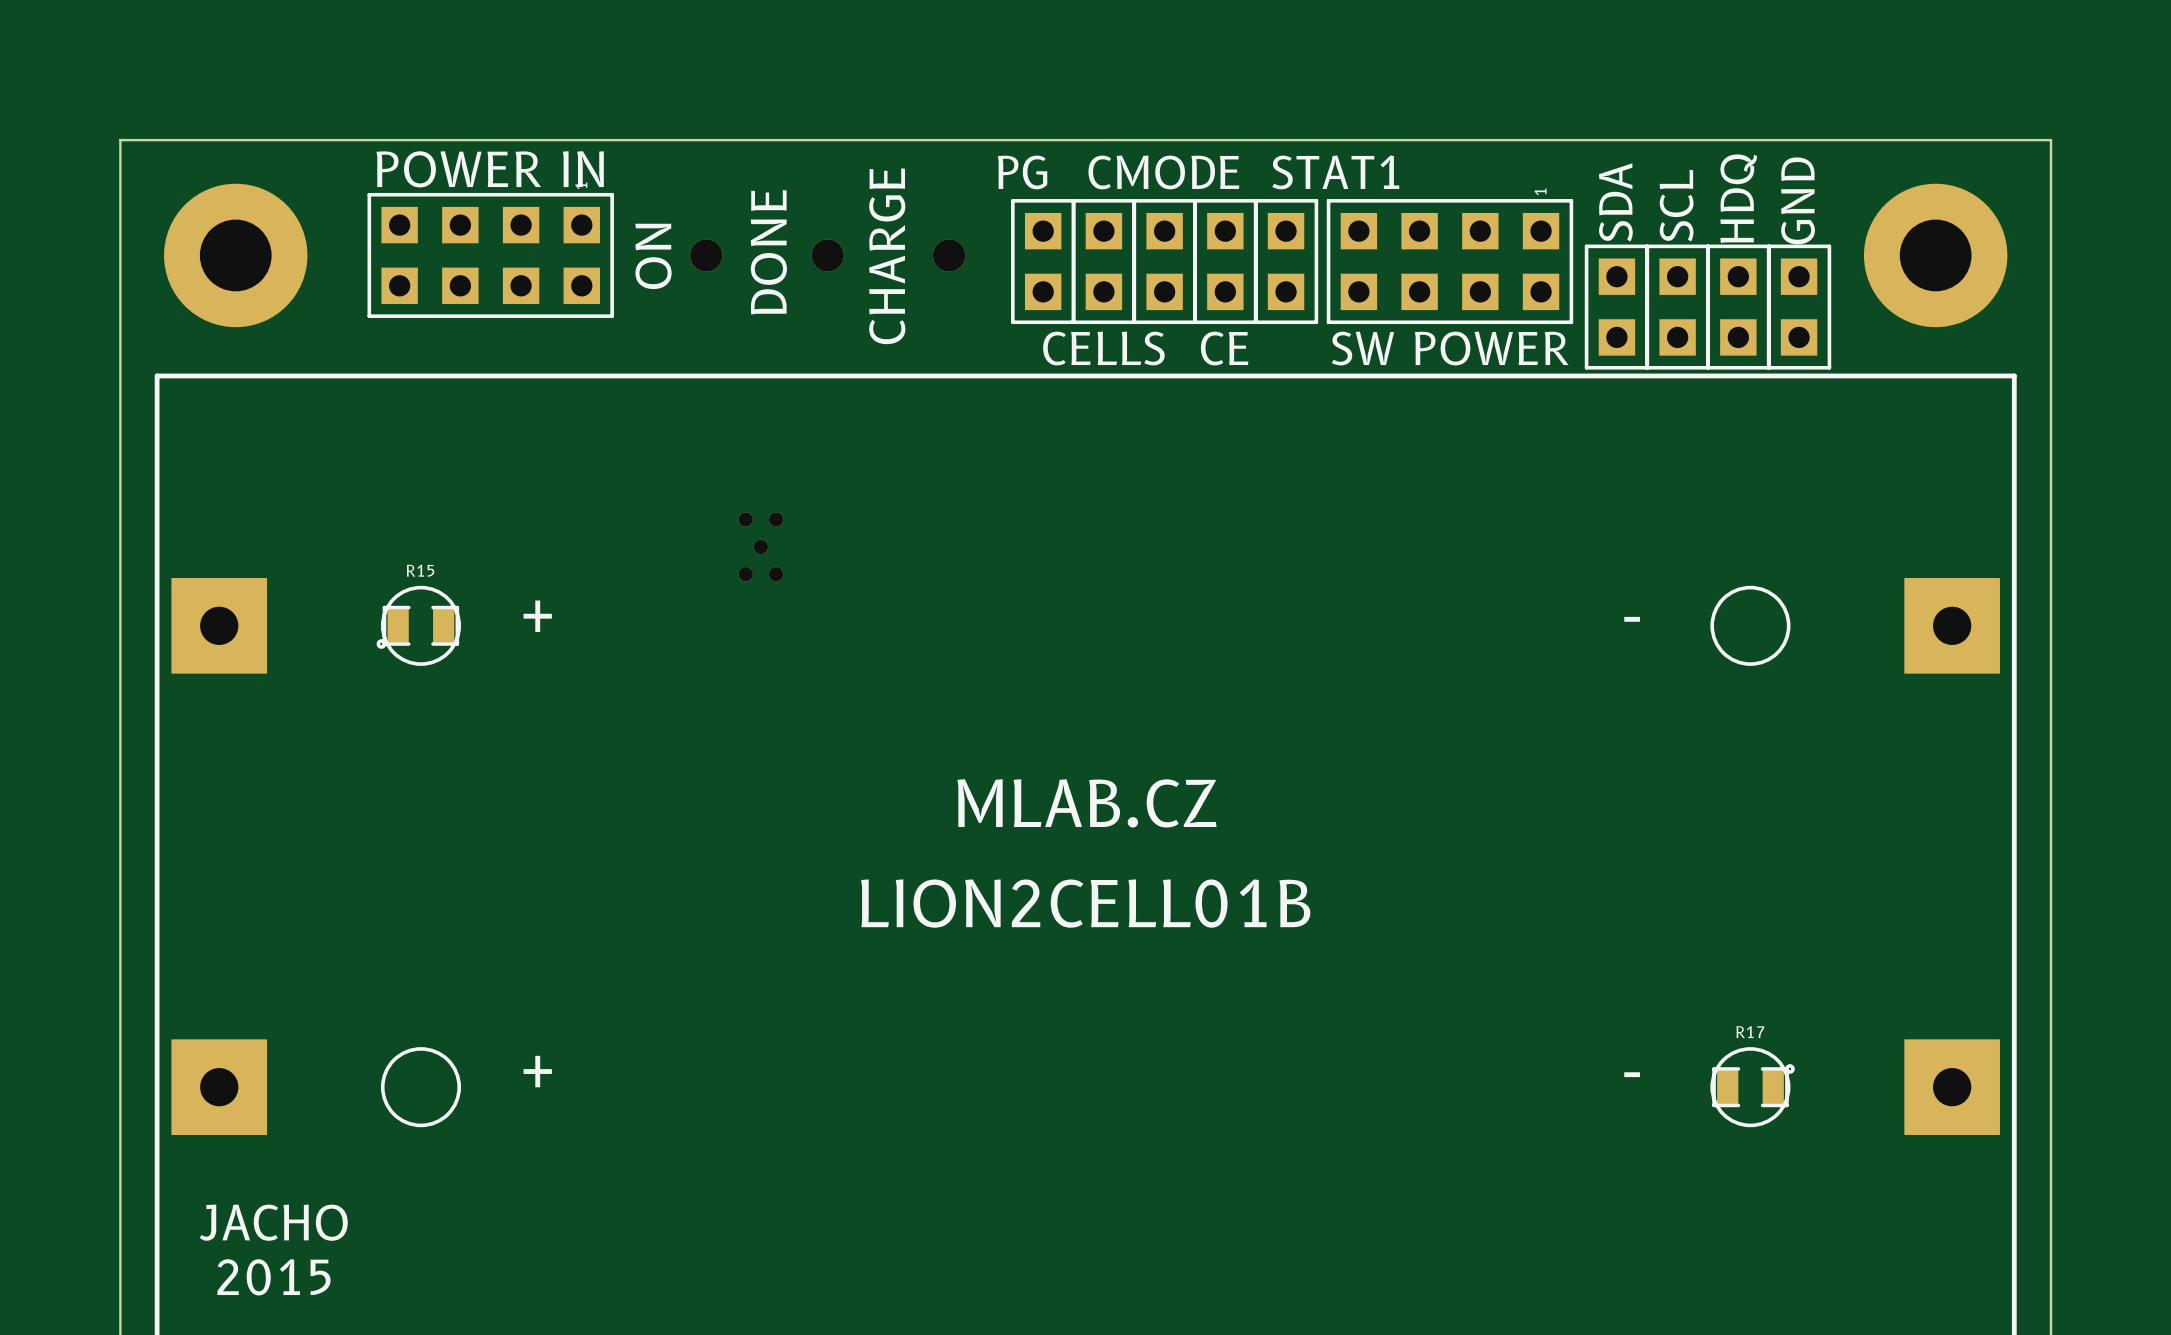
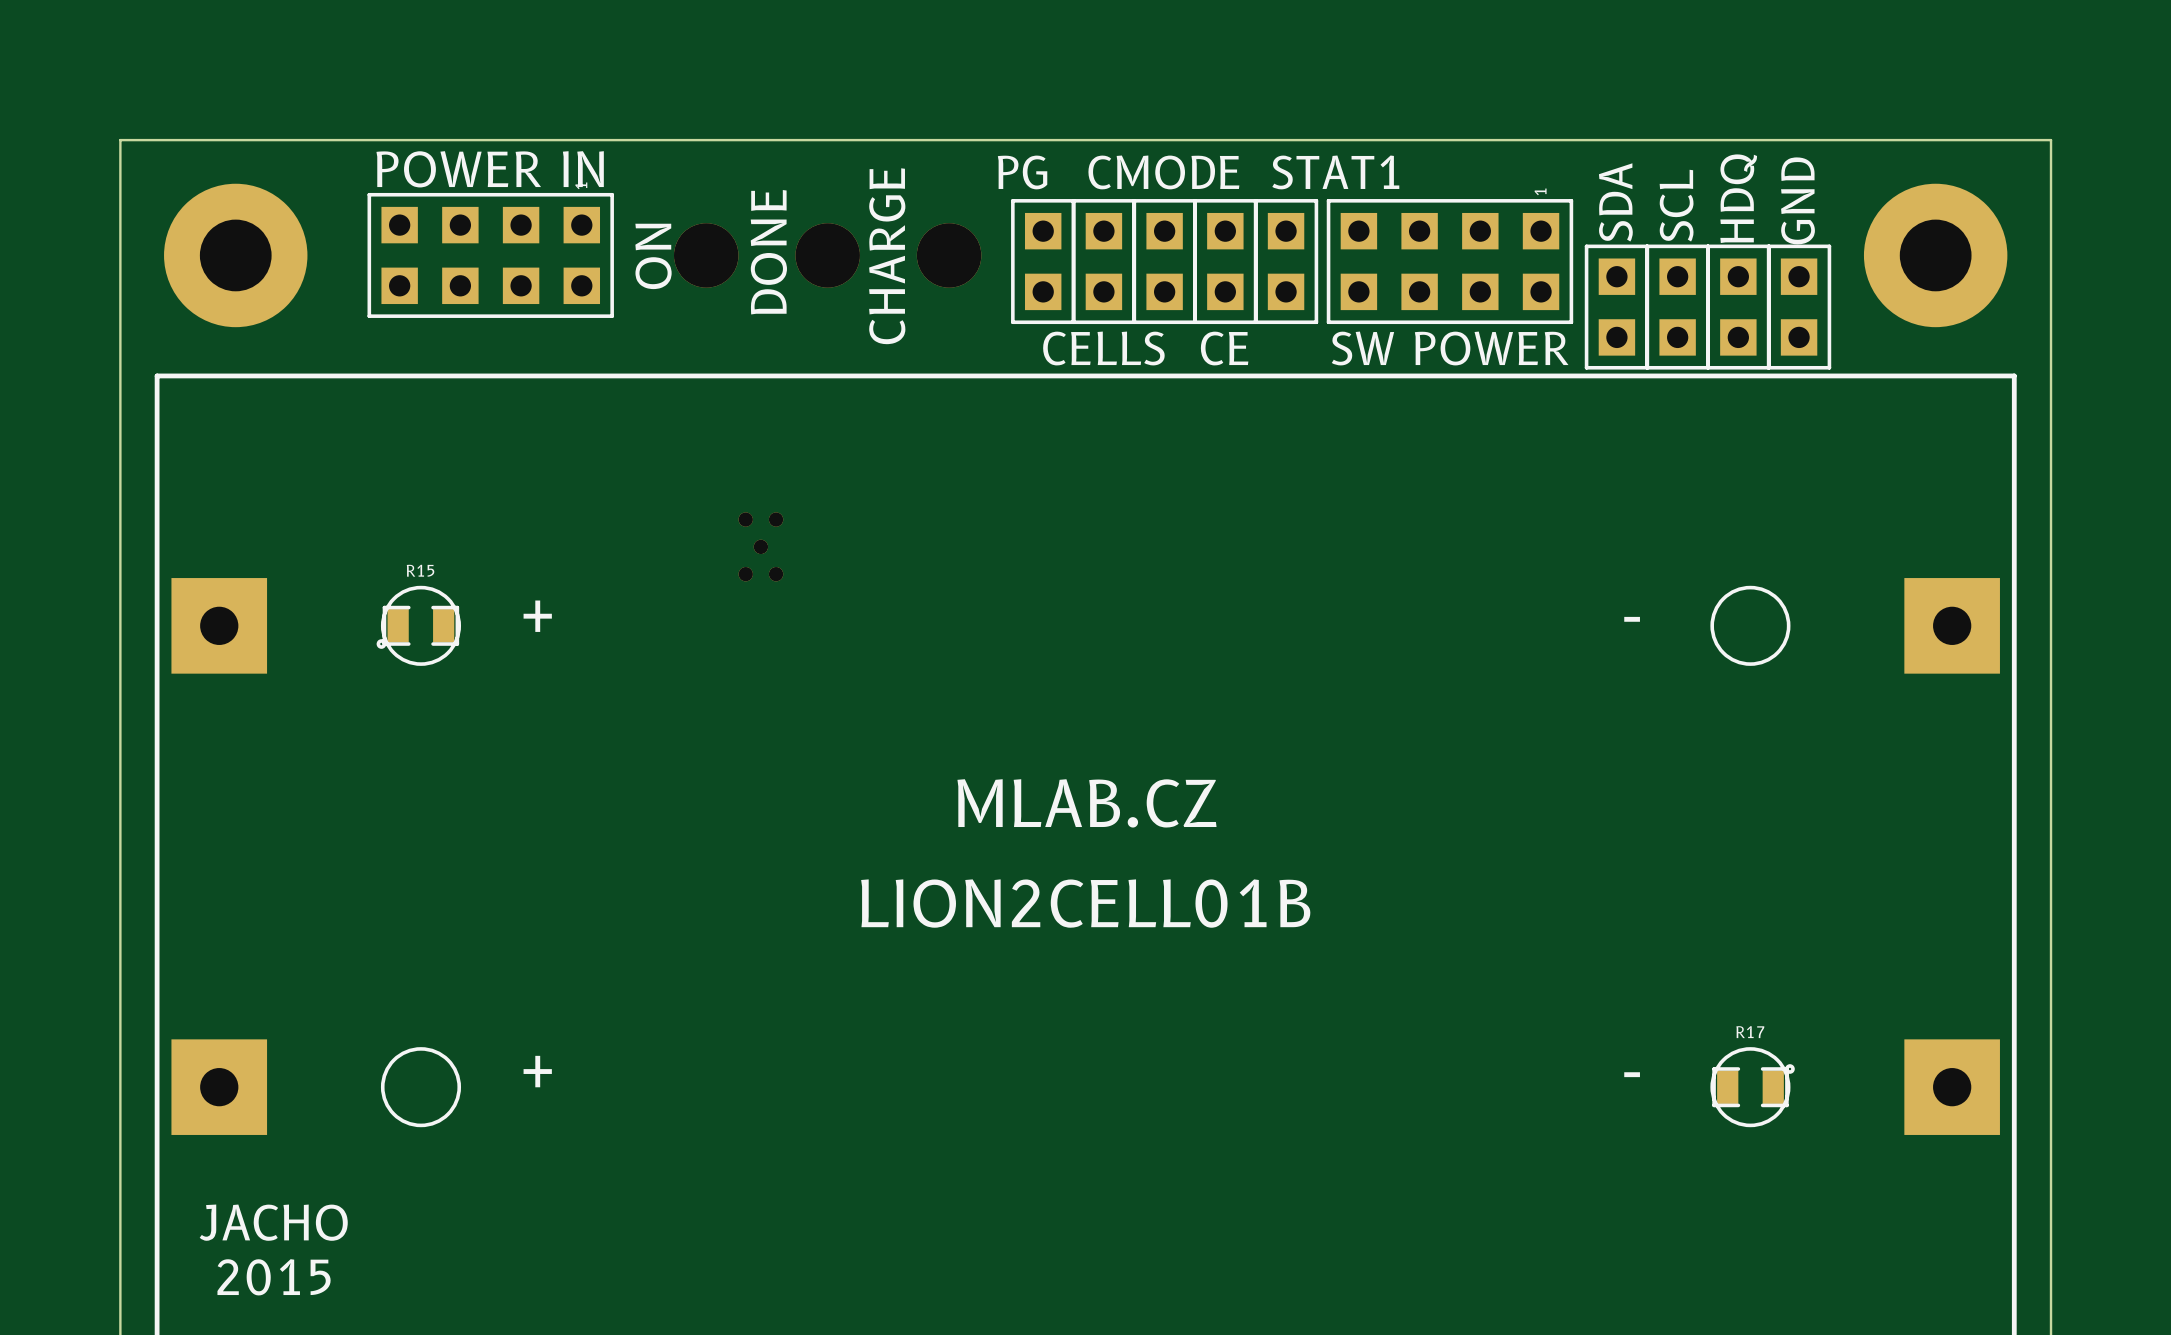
part footprint: [690, 239, 723, 272] -> [673, 223, 739, 288]
part footprint: [811, 239, 844, 272] -> [795, 223, 860, 288]
part footprint: [932, 239, 966, 272] -> [916, 223, 982, 288]

